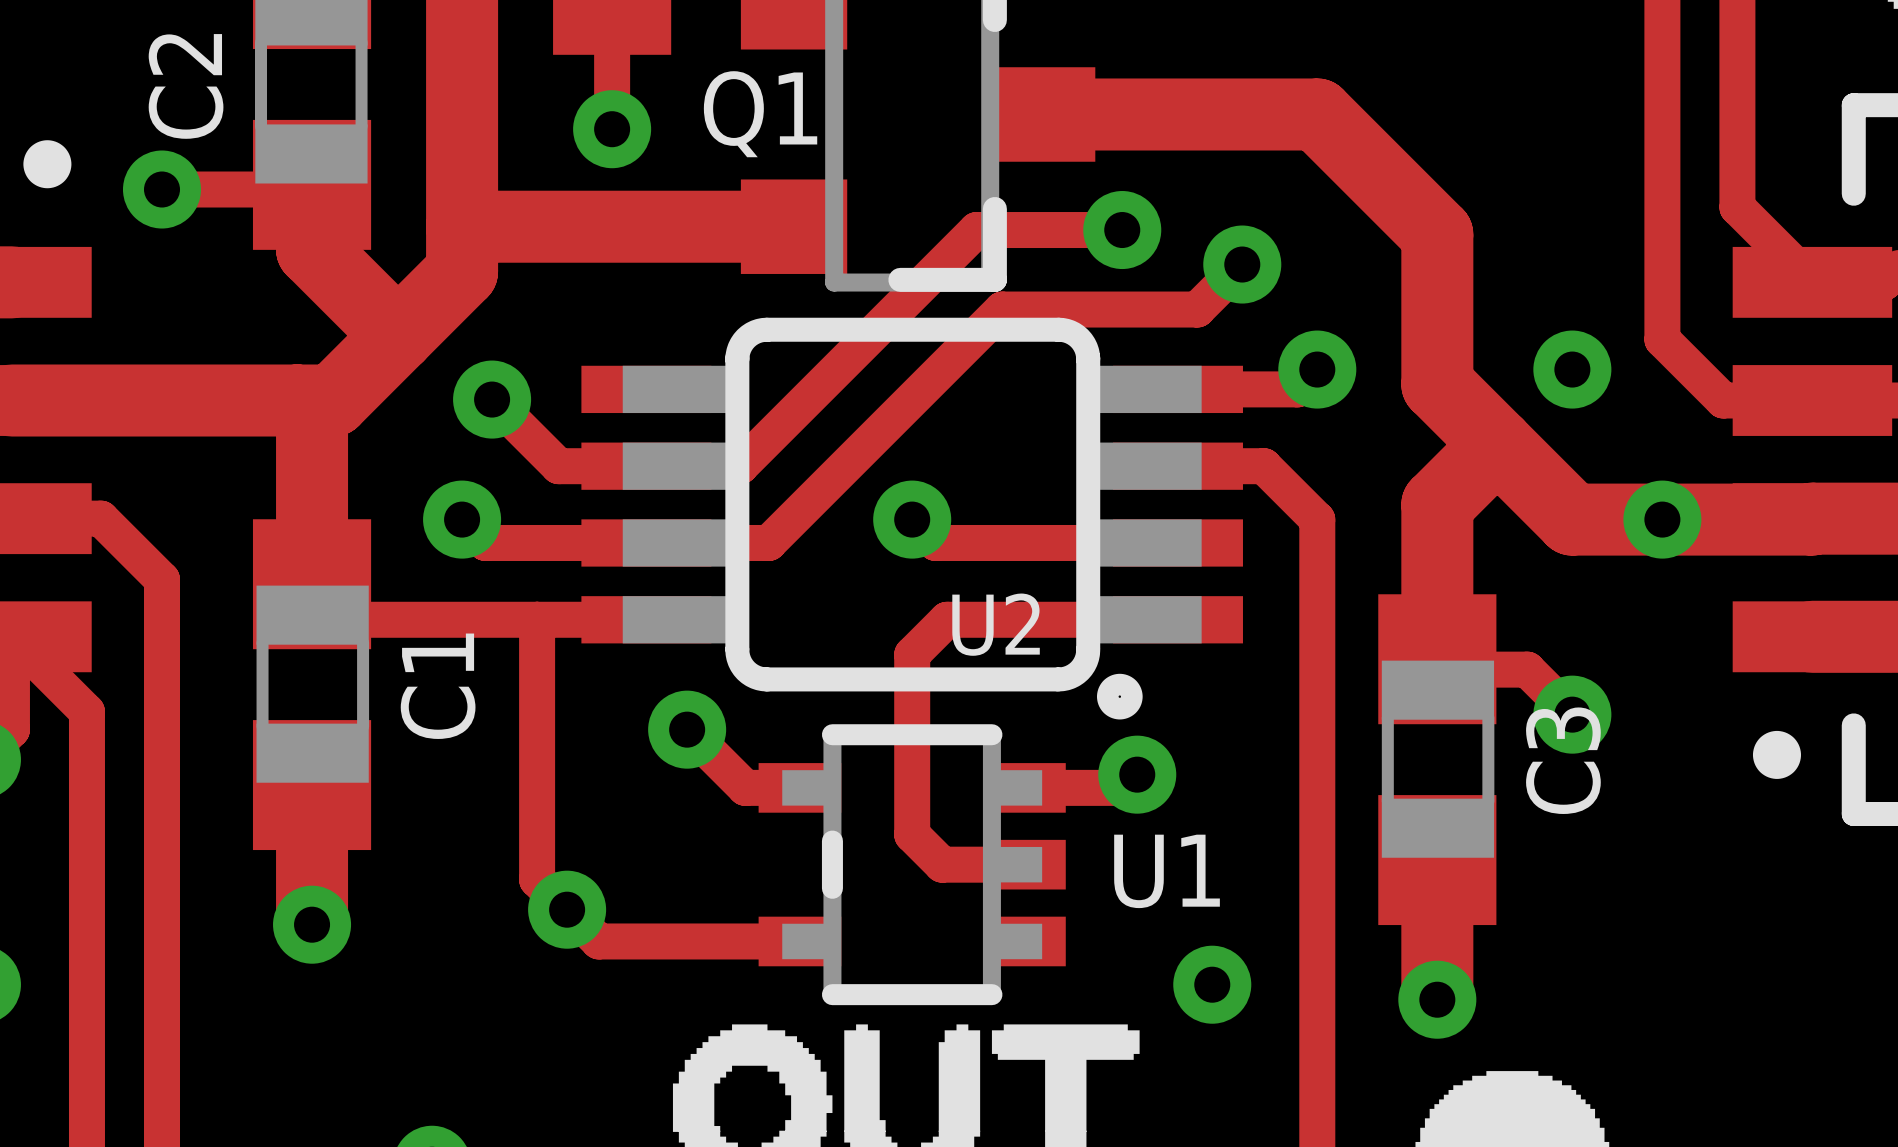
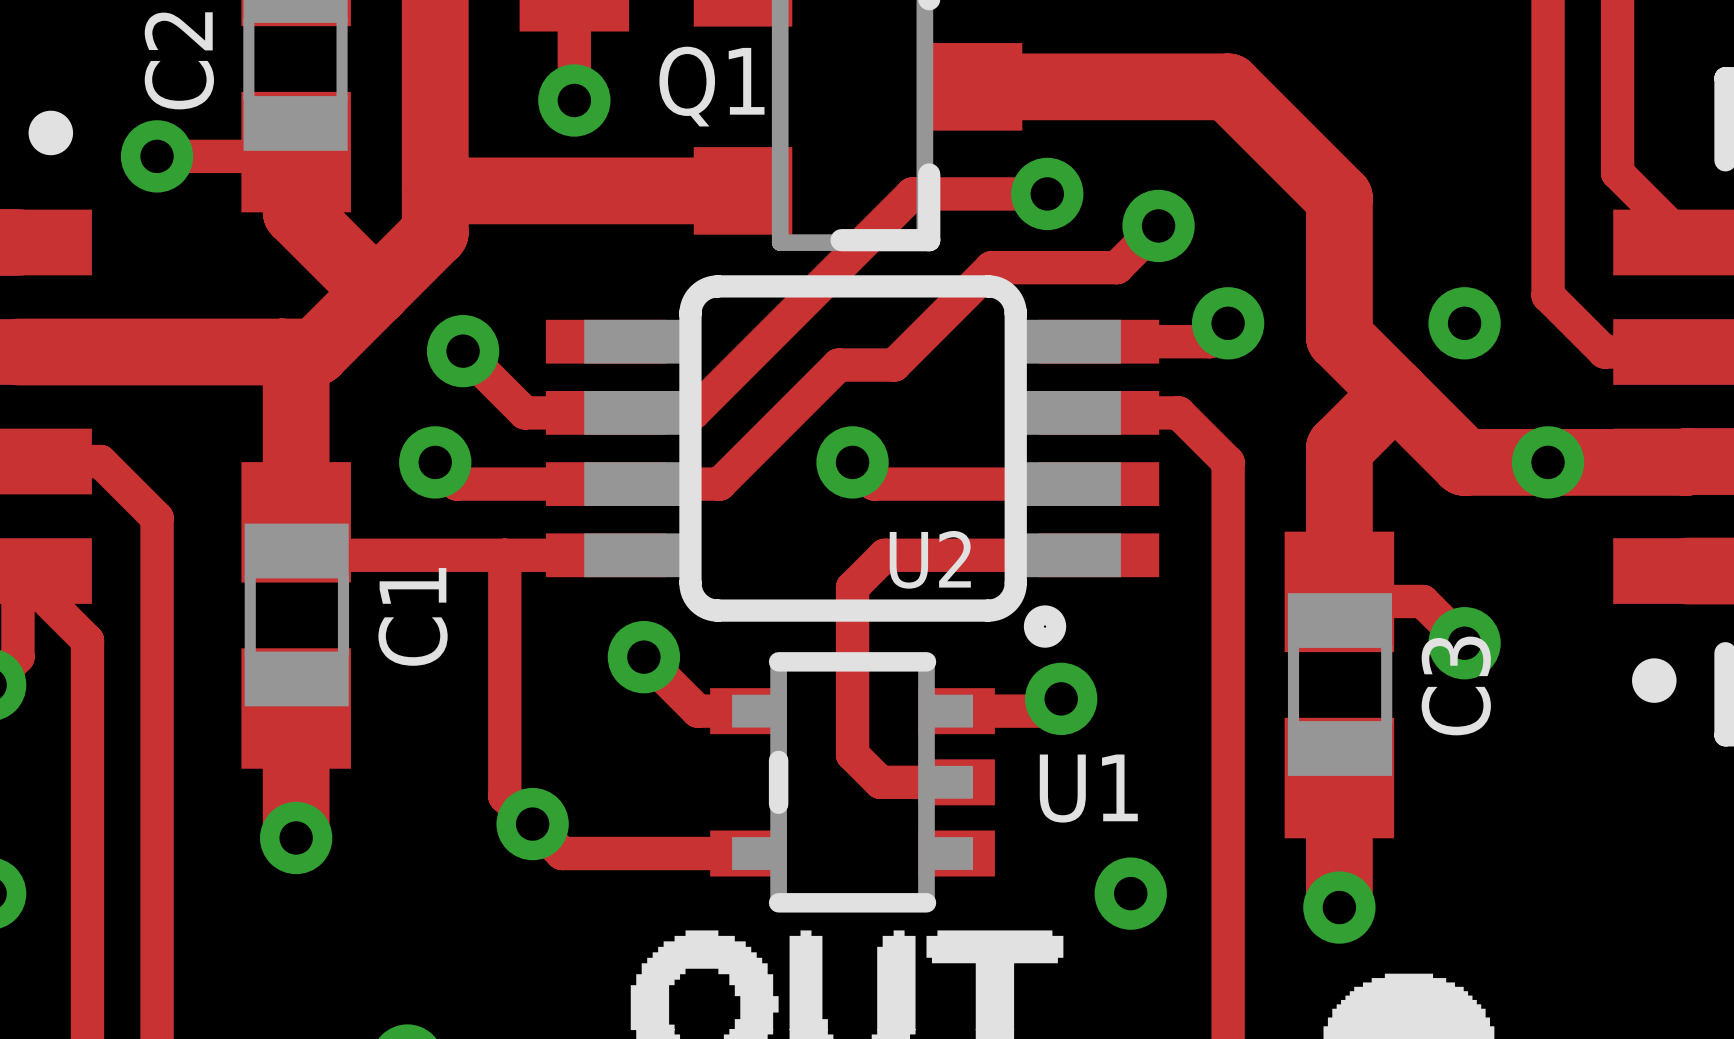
track: (1062, 309) (1002, 309) (897, 414) -> (991, 267) (894, 365) (838, 365)

